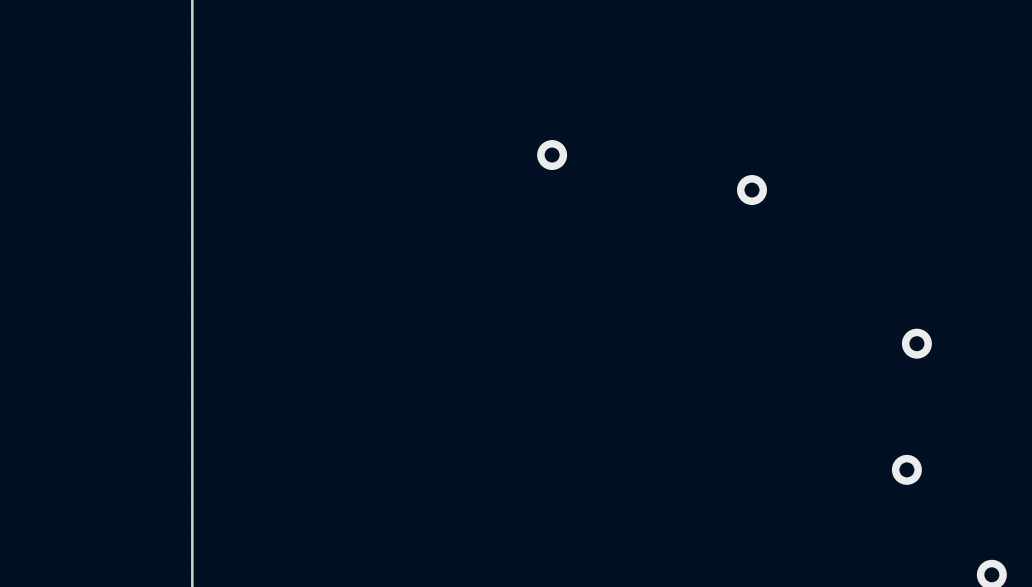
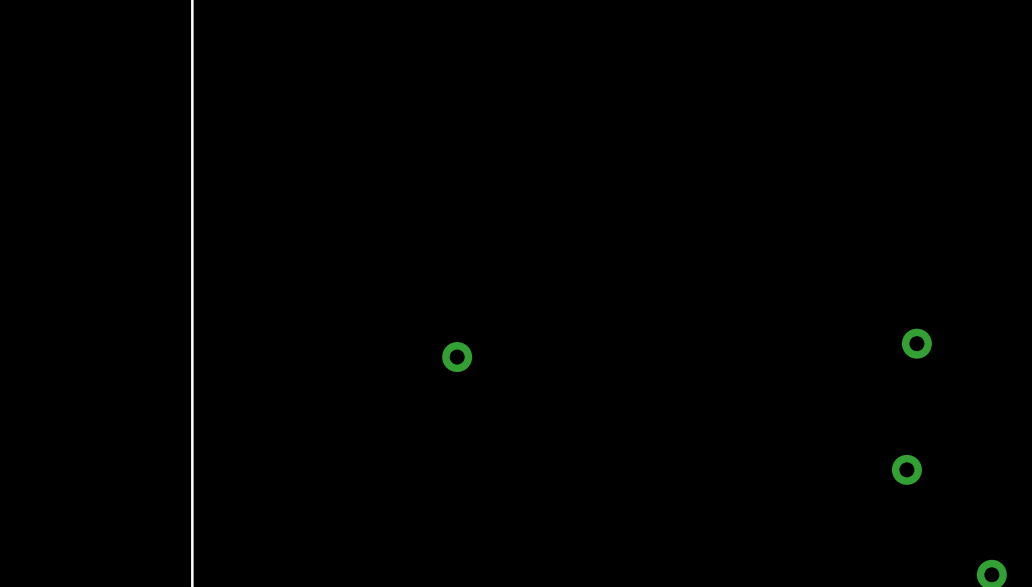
via: (552, 155) -> none
via: (751, 190) -> none
via: none -> (457, 357)

